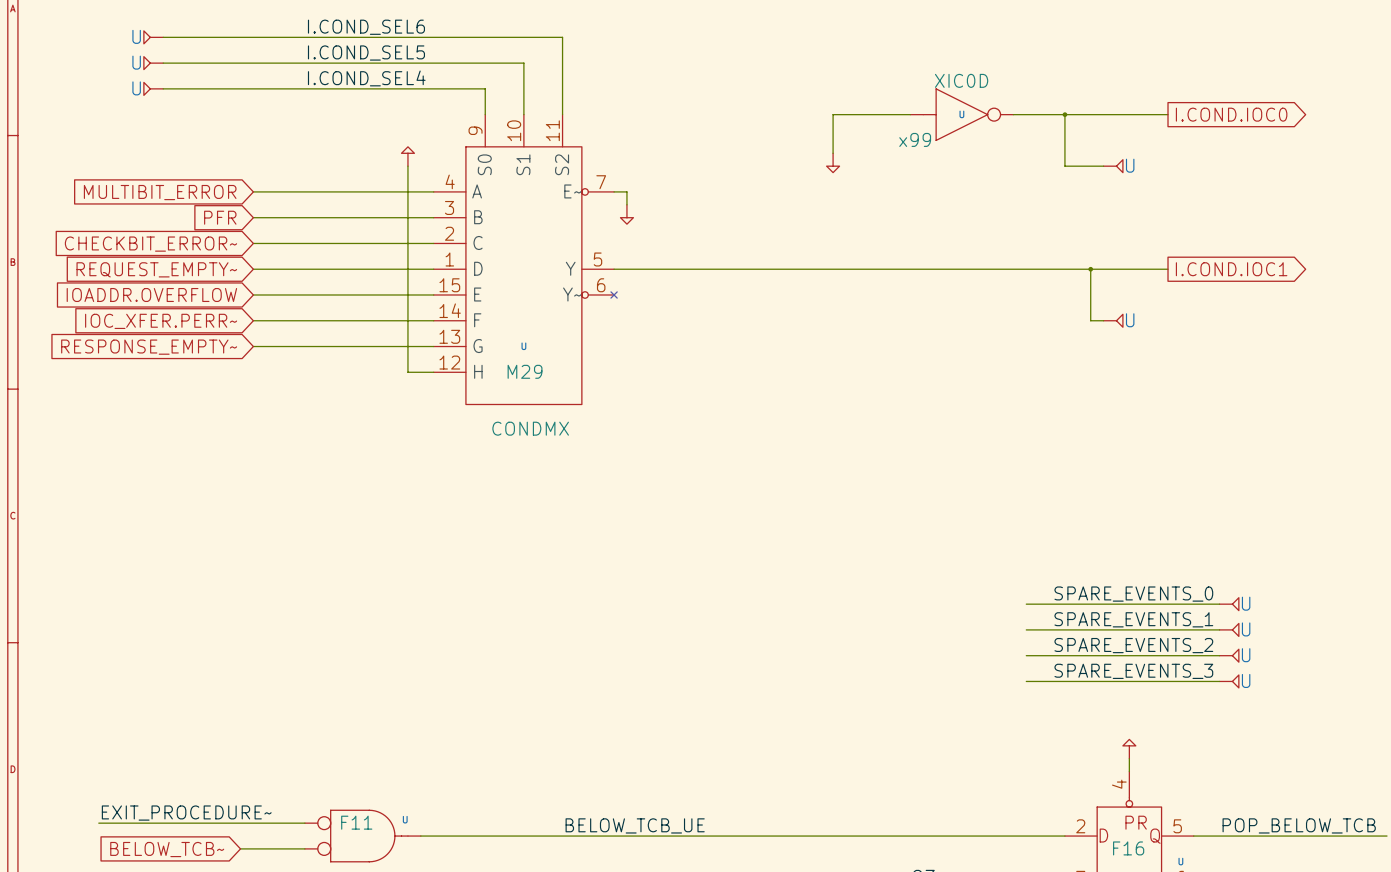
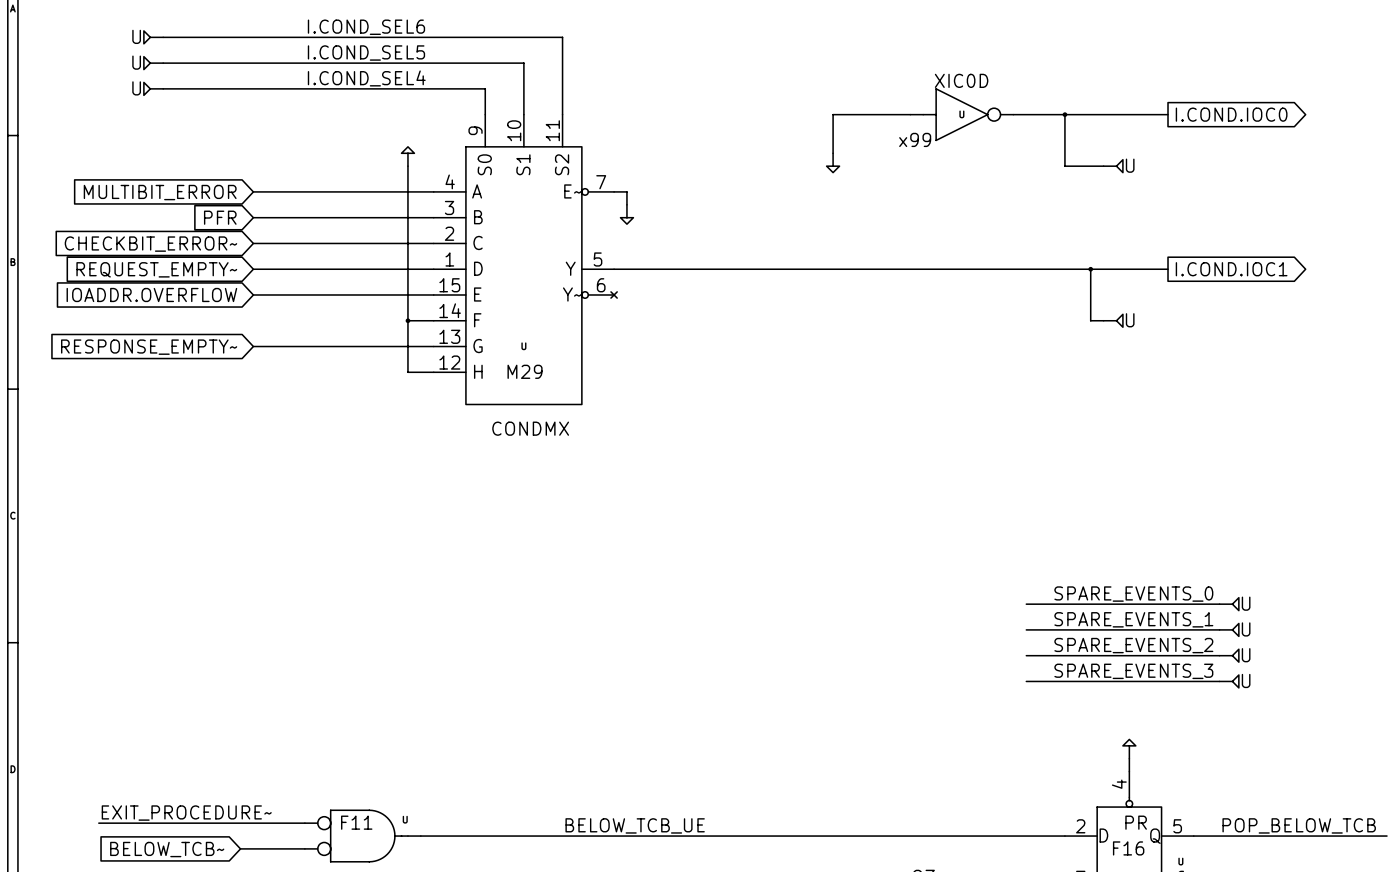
wire: (253, 320) (407, 320) -> none
junction: none -> (407, 320)
global label: IOC_XFER.PERR~ (161, 321) -> none

